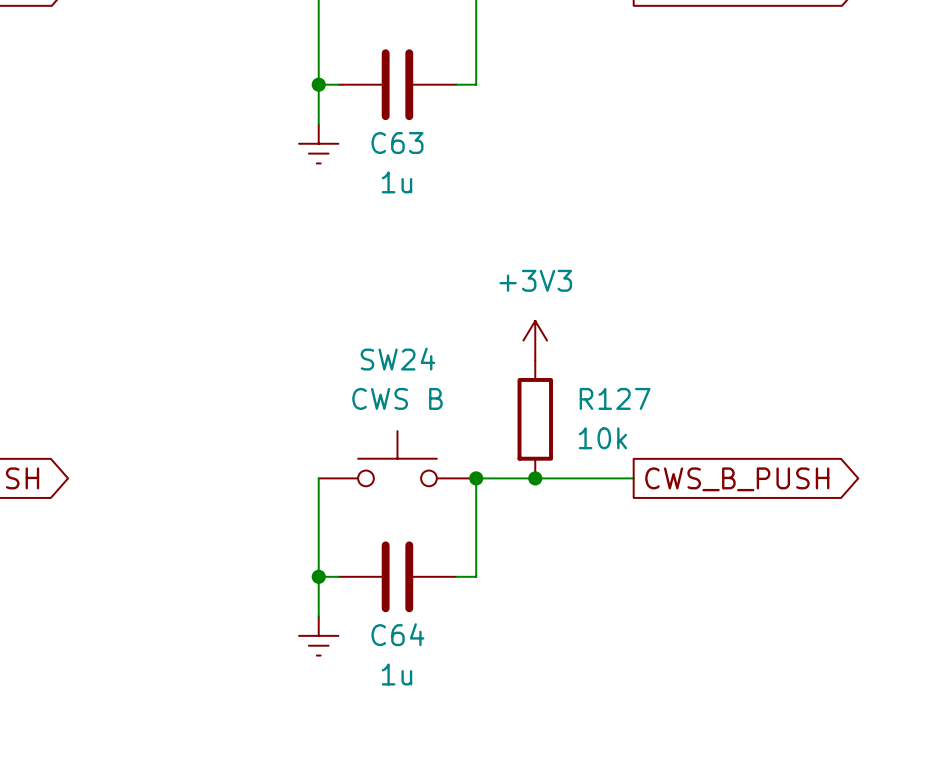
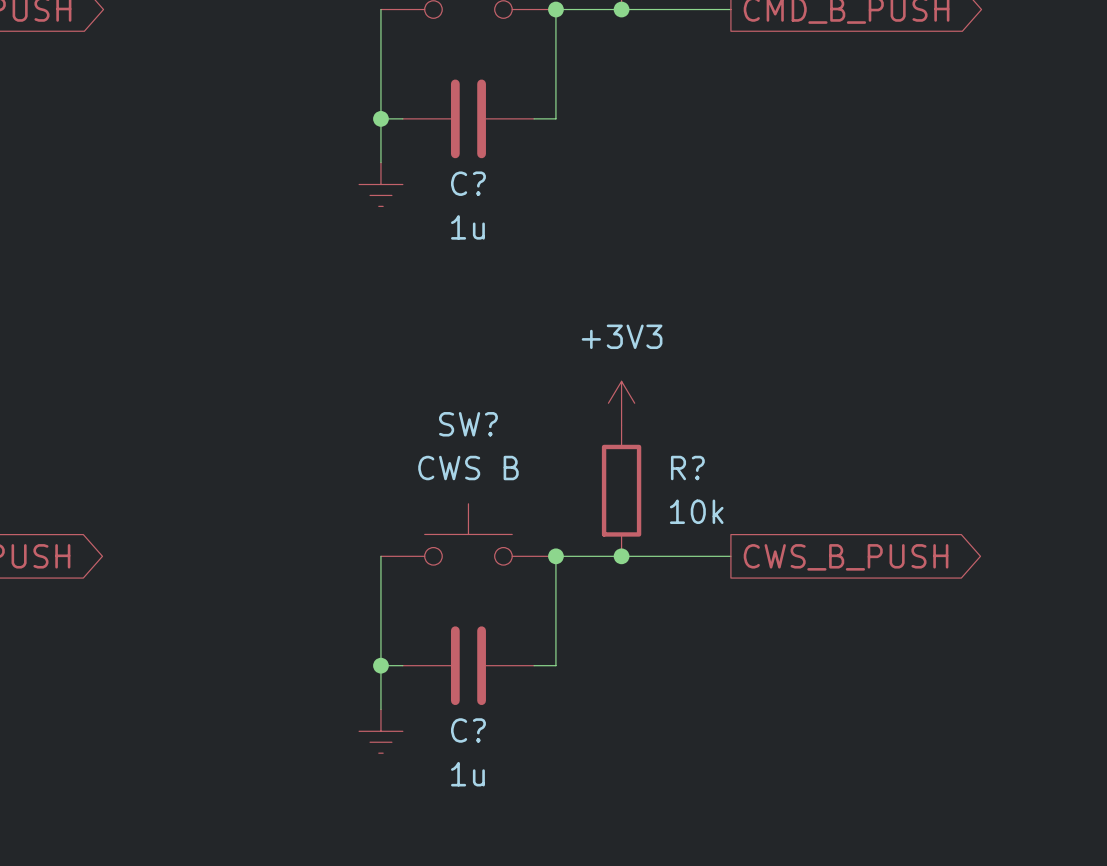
C63 name: C63 (397, 143) -> C? (468, 183)
SW24 name: SW24 (397, 359) -> SW? (468, 424)
R127 name: R127 (615, 398) -> R? (687, 468)
C64 name: C64 (397, 634) -> C? (468, 730)

